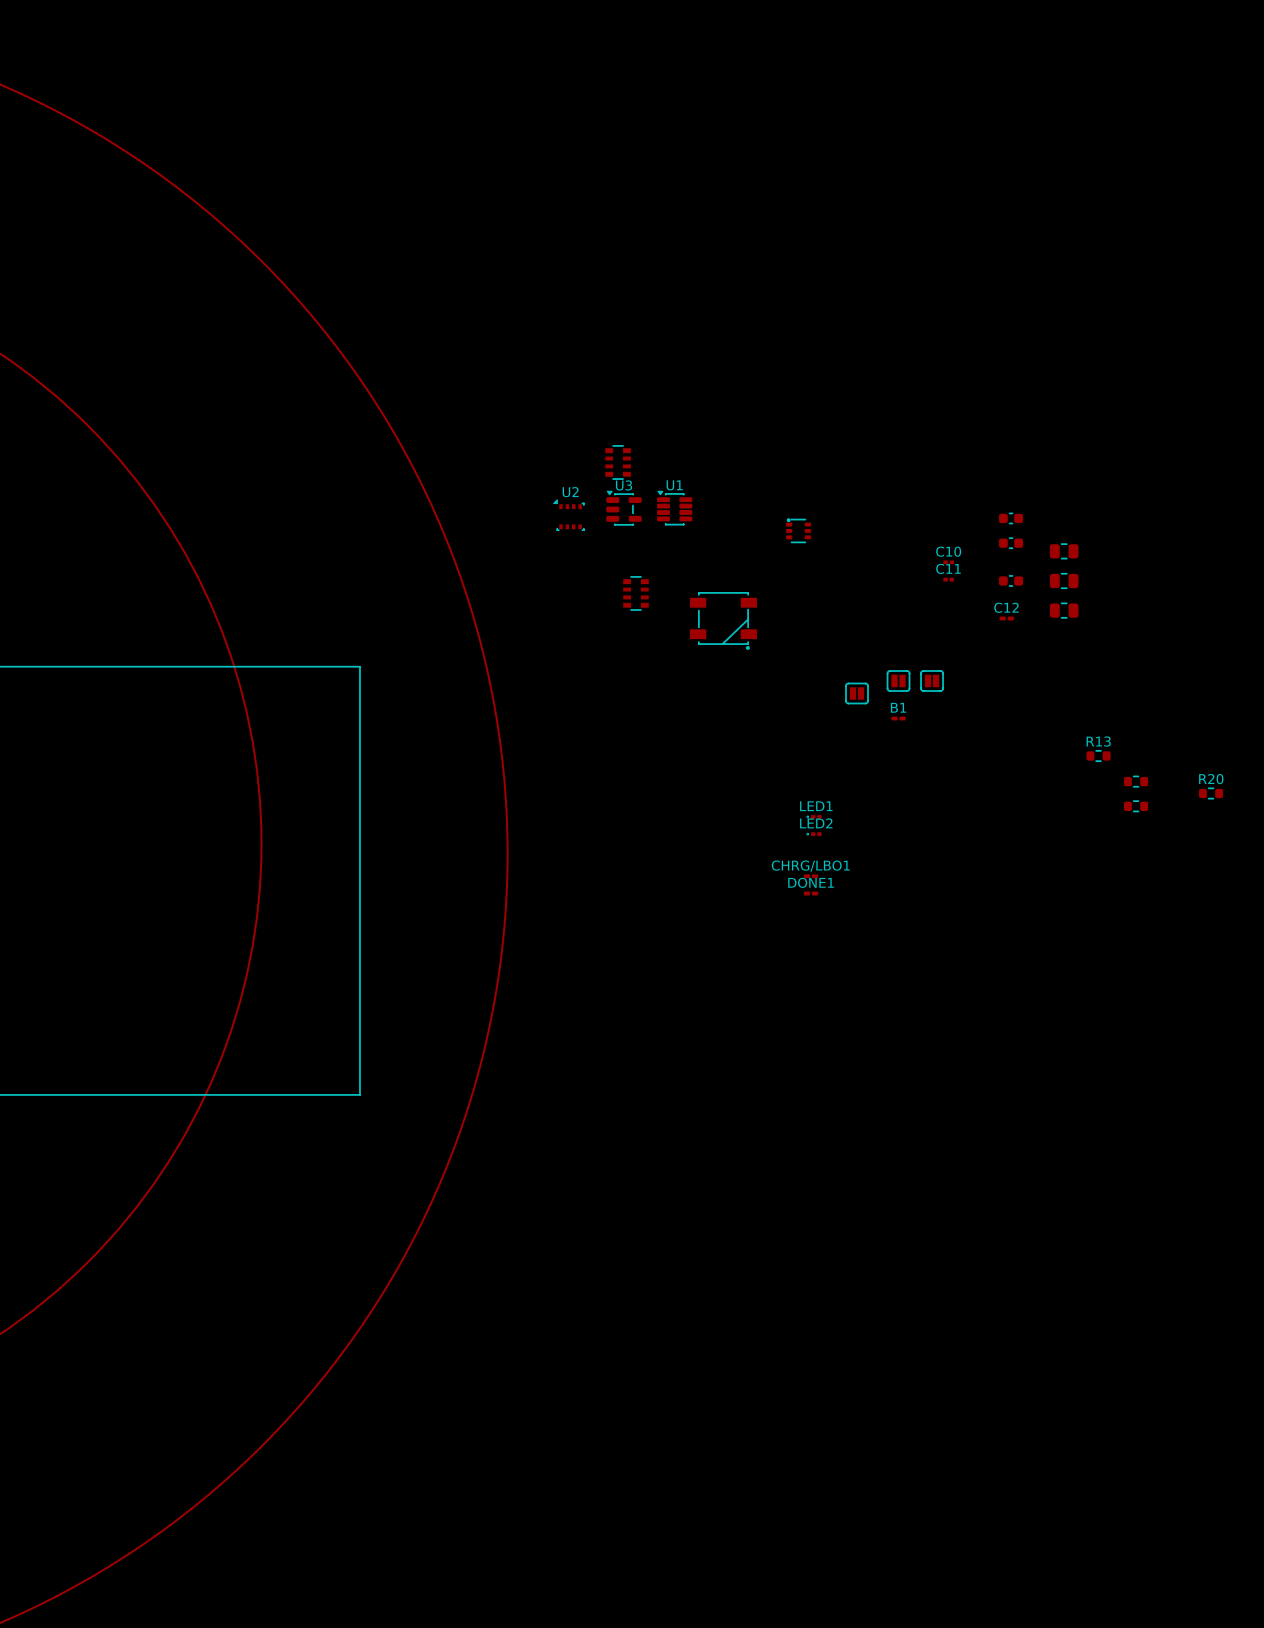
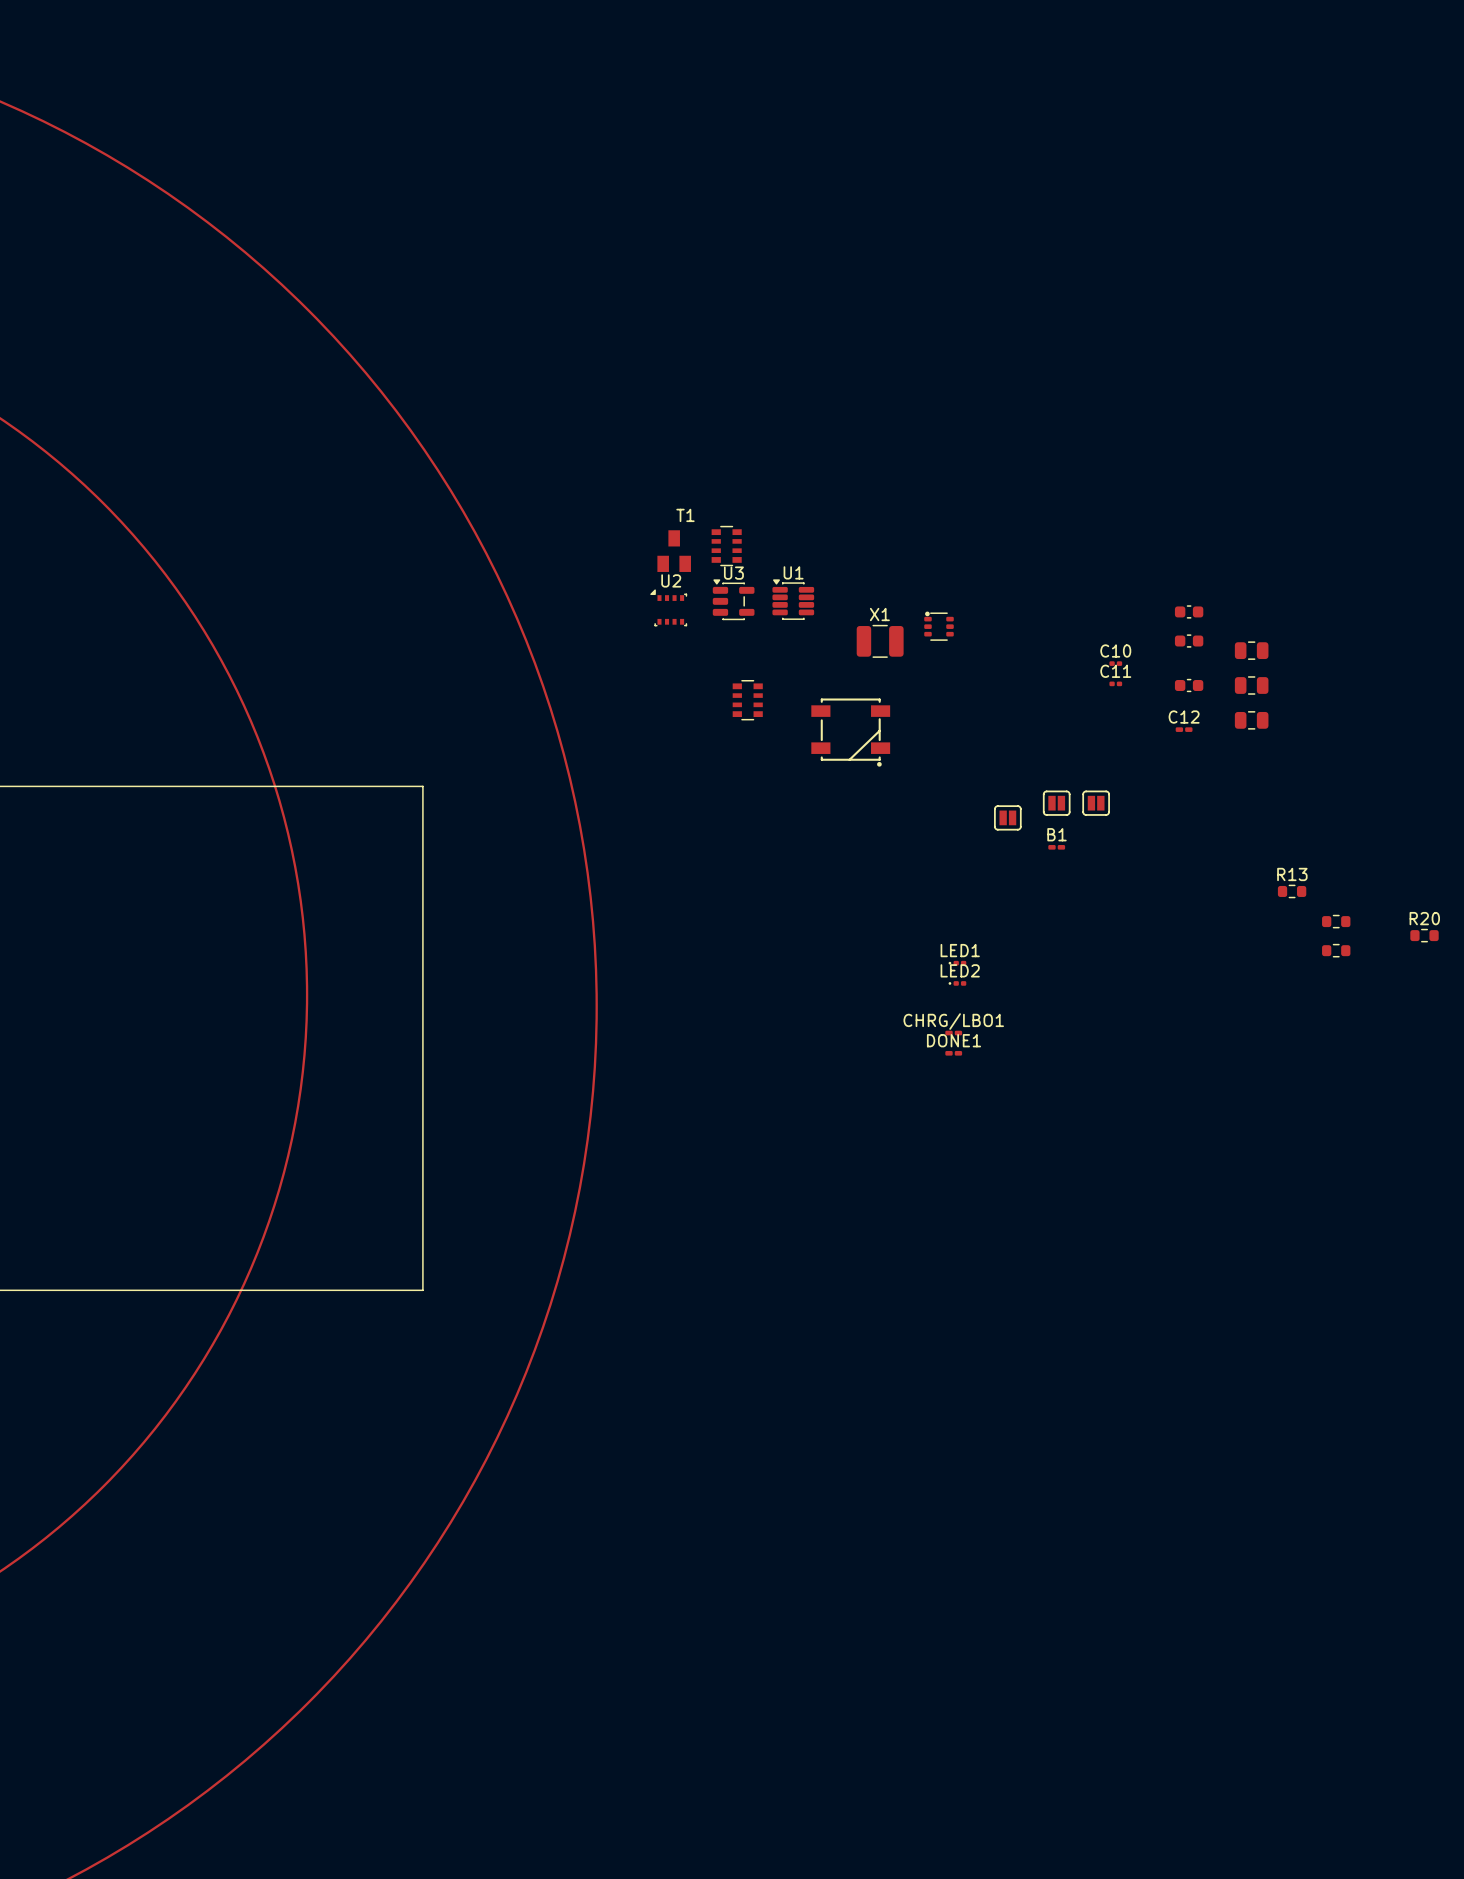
T1: none -> (674, 551)
X1: none -> (880, 641)

